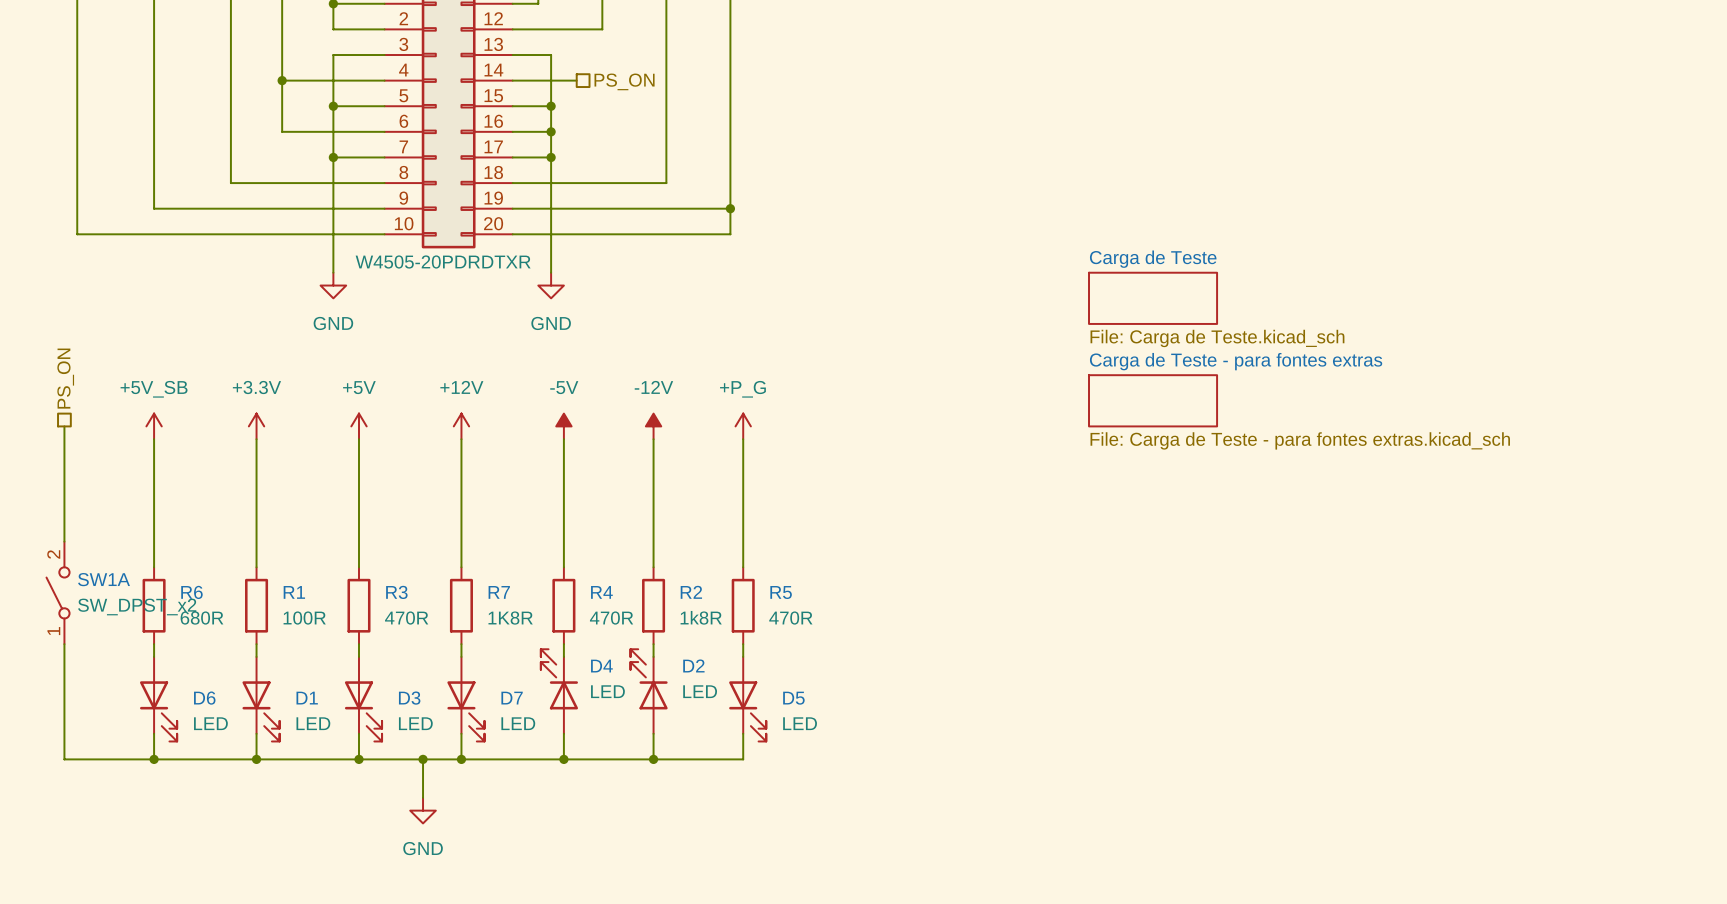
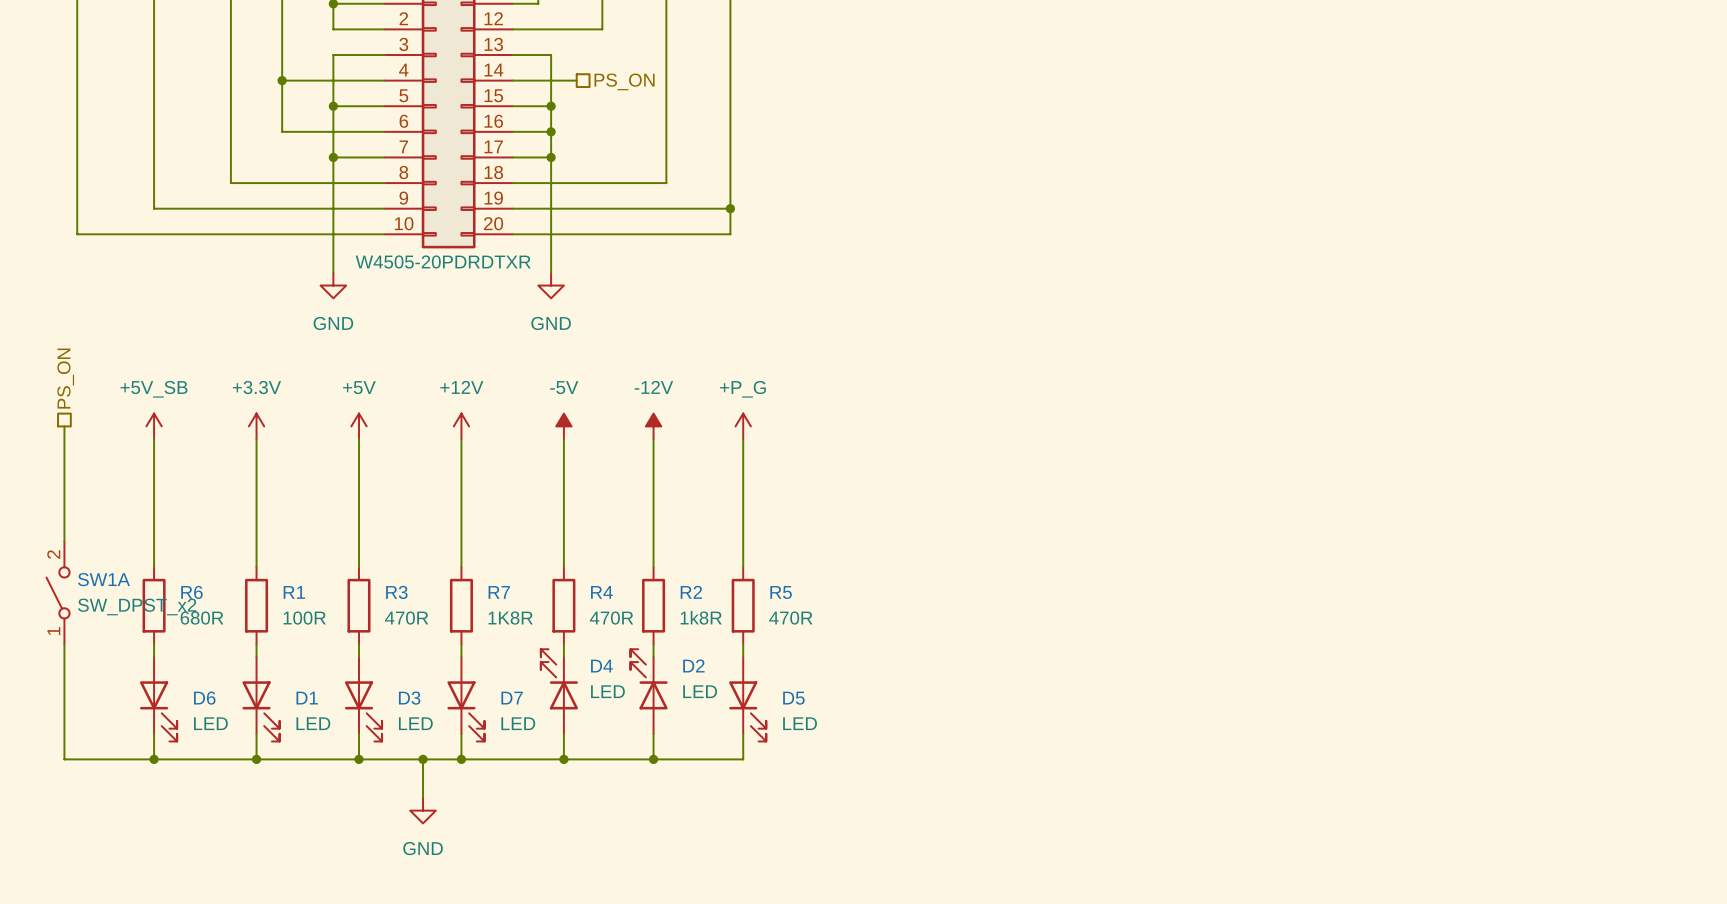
sheet Carga de Teste: File: Carga de Teste.kicad_sch (1153, 298) -> none
sheet Carga de Teste - para fontes extras: File: Carga de Teste - para fontes extras.kicad_sch (1153, 400) -> none

